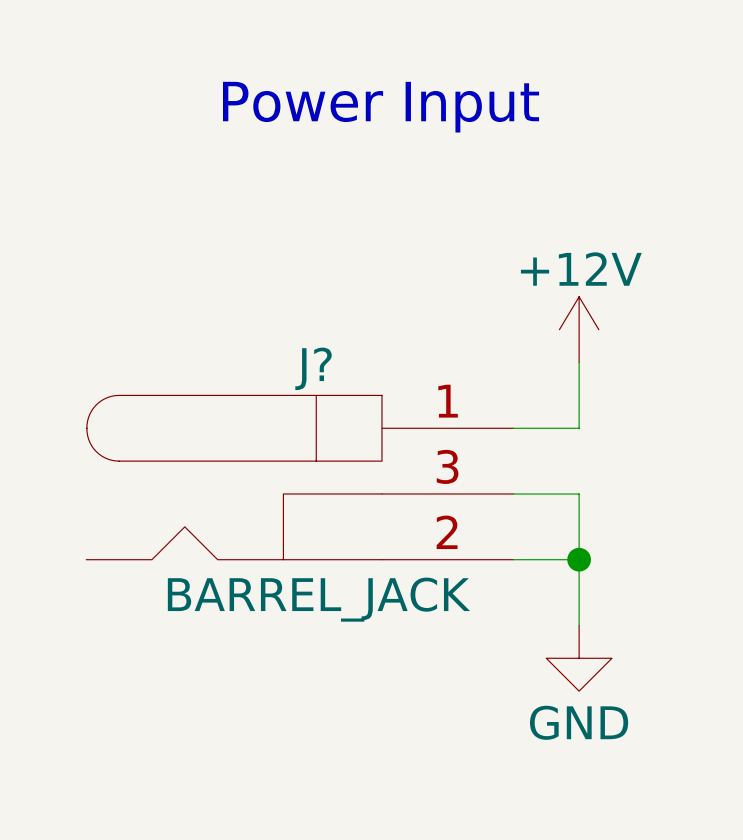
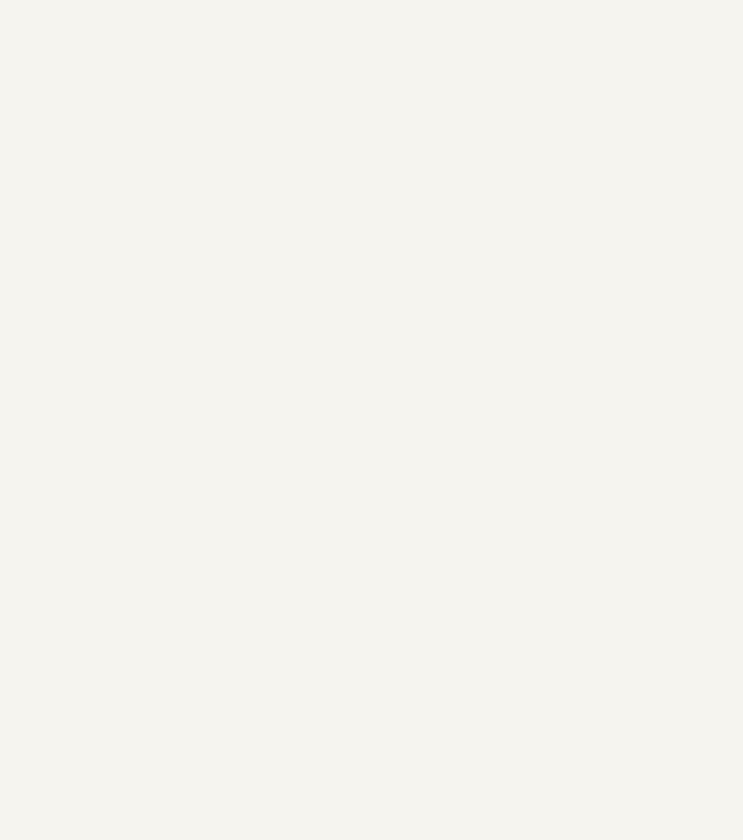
text: Power Input (381, 107) -> none
power symbol: +12V (579, 329) -> none
wire: (579, 362) (579, 428) (513, 428) -> none
J?: BARREL_JACK (299, 477) -> none
wire: (513, 493) (579, 493) (579, 625) -> none
wire: (513, 559) (579, 559) -> none
junction: (579, 559) -> none
power symbol: GND (579, 658) -> none

